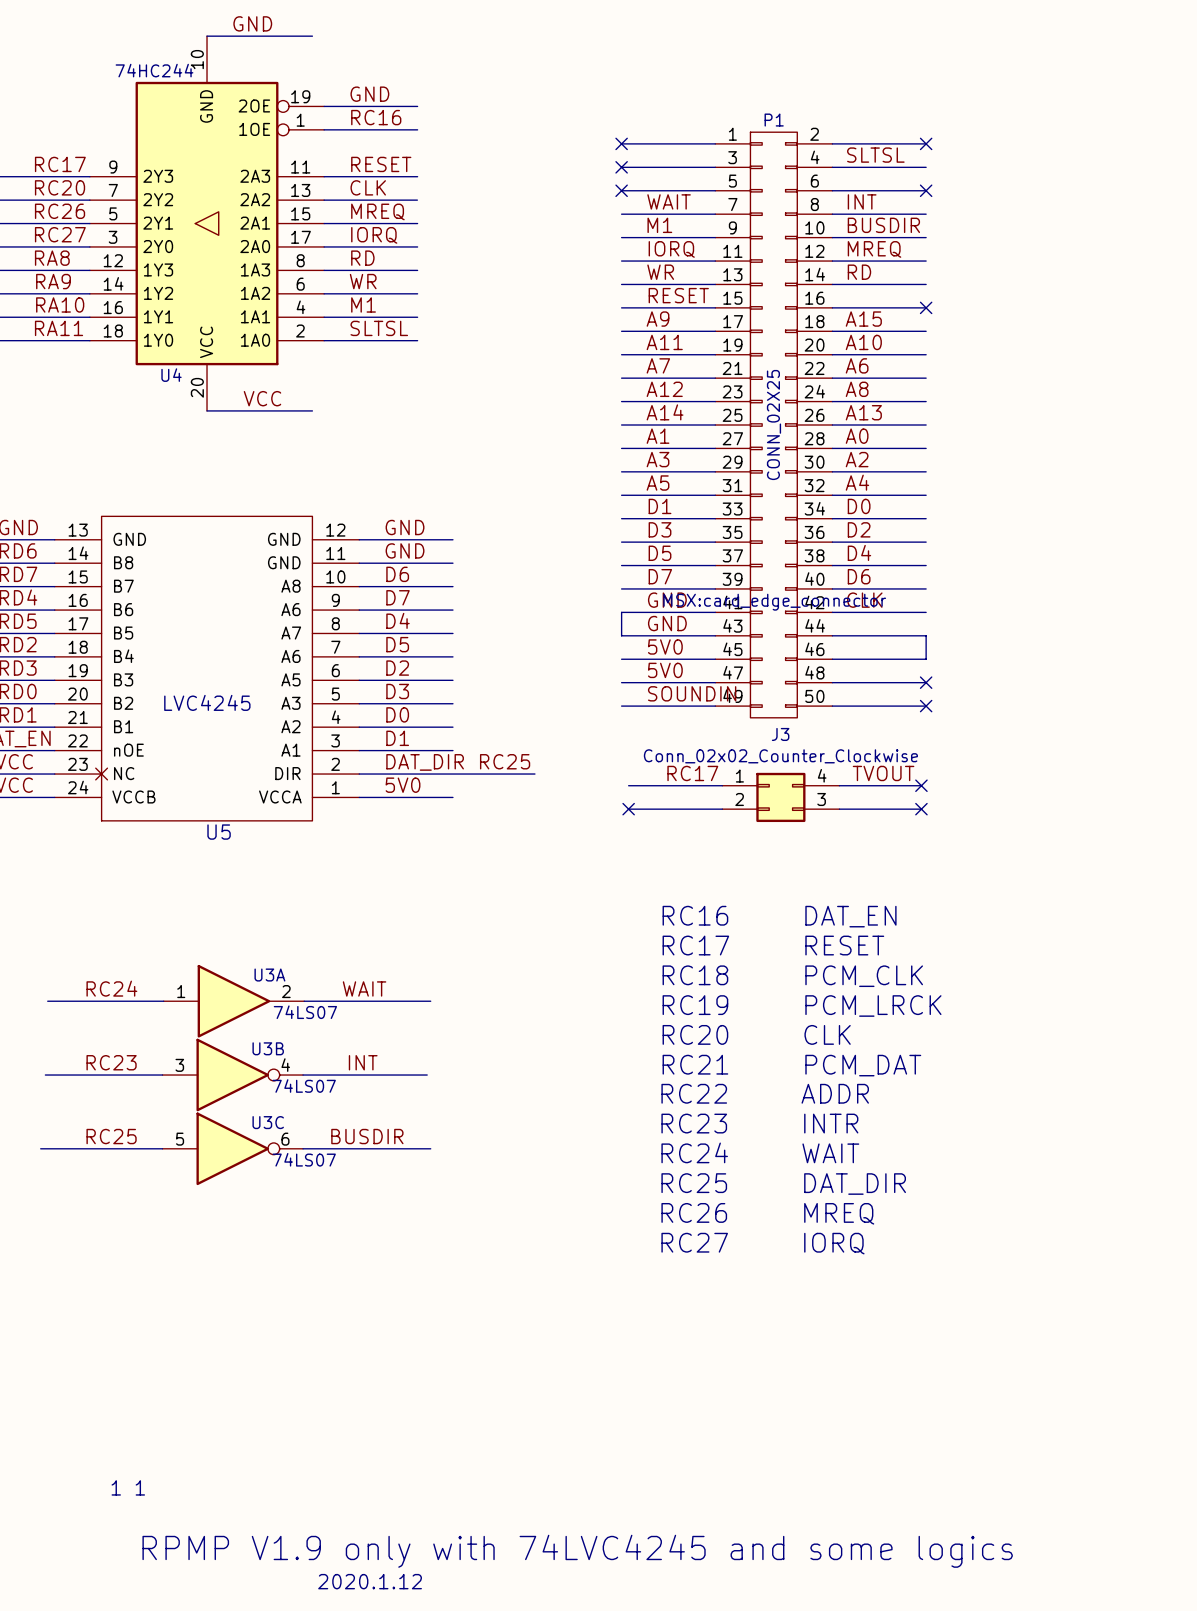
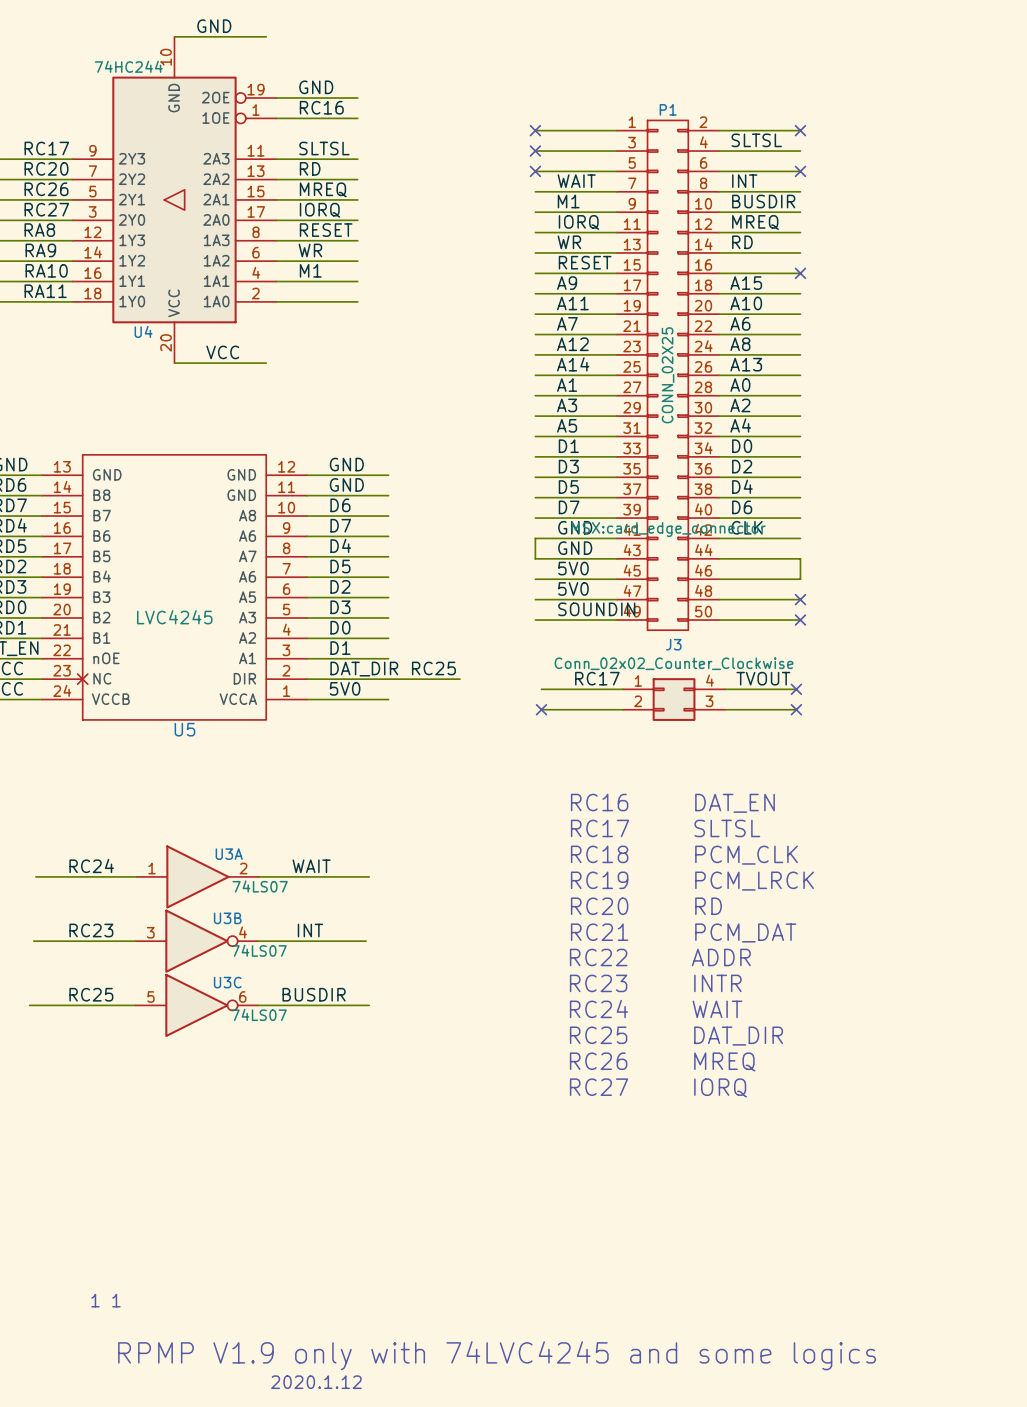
label: RESET (381, 164) -> SLTSL (324, 148)
label: CLK (368, 187) -> RD (310, 168)
label: RD (362, 258) -> RESET (326, 230)
label: SLTSL (379, 328) -> none
text: RC17 RESET (773, 945) -> RC17 SLTSL (665, 828)
text: RC20 CLK (756, 1034) -> RC20 RD (646, 906)

